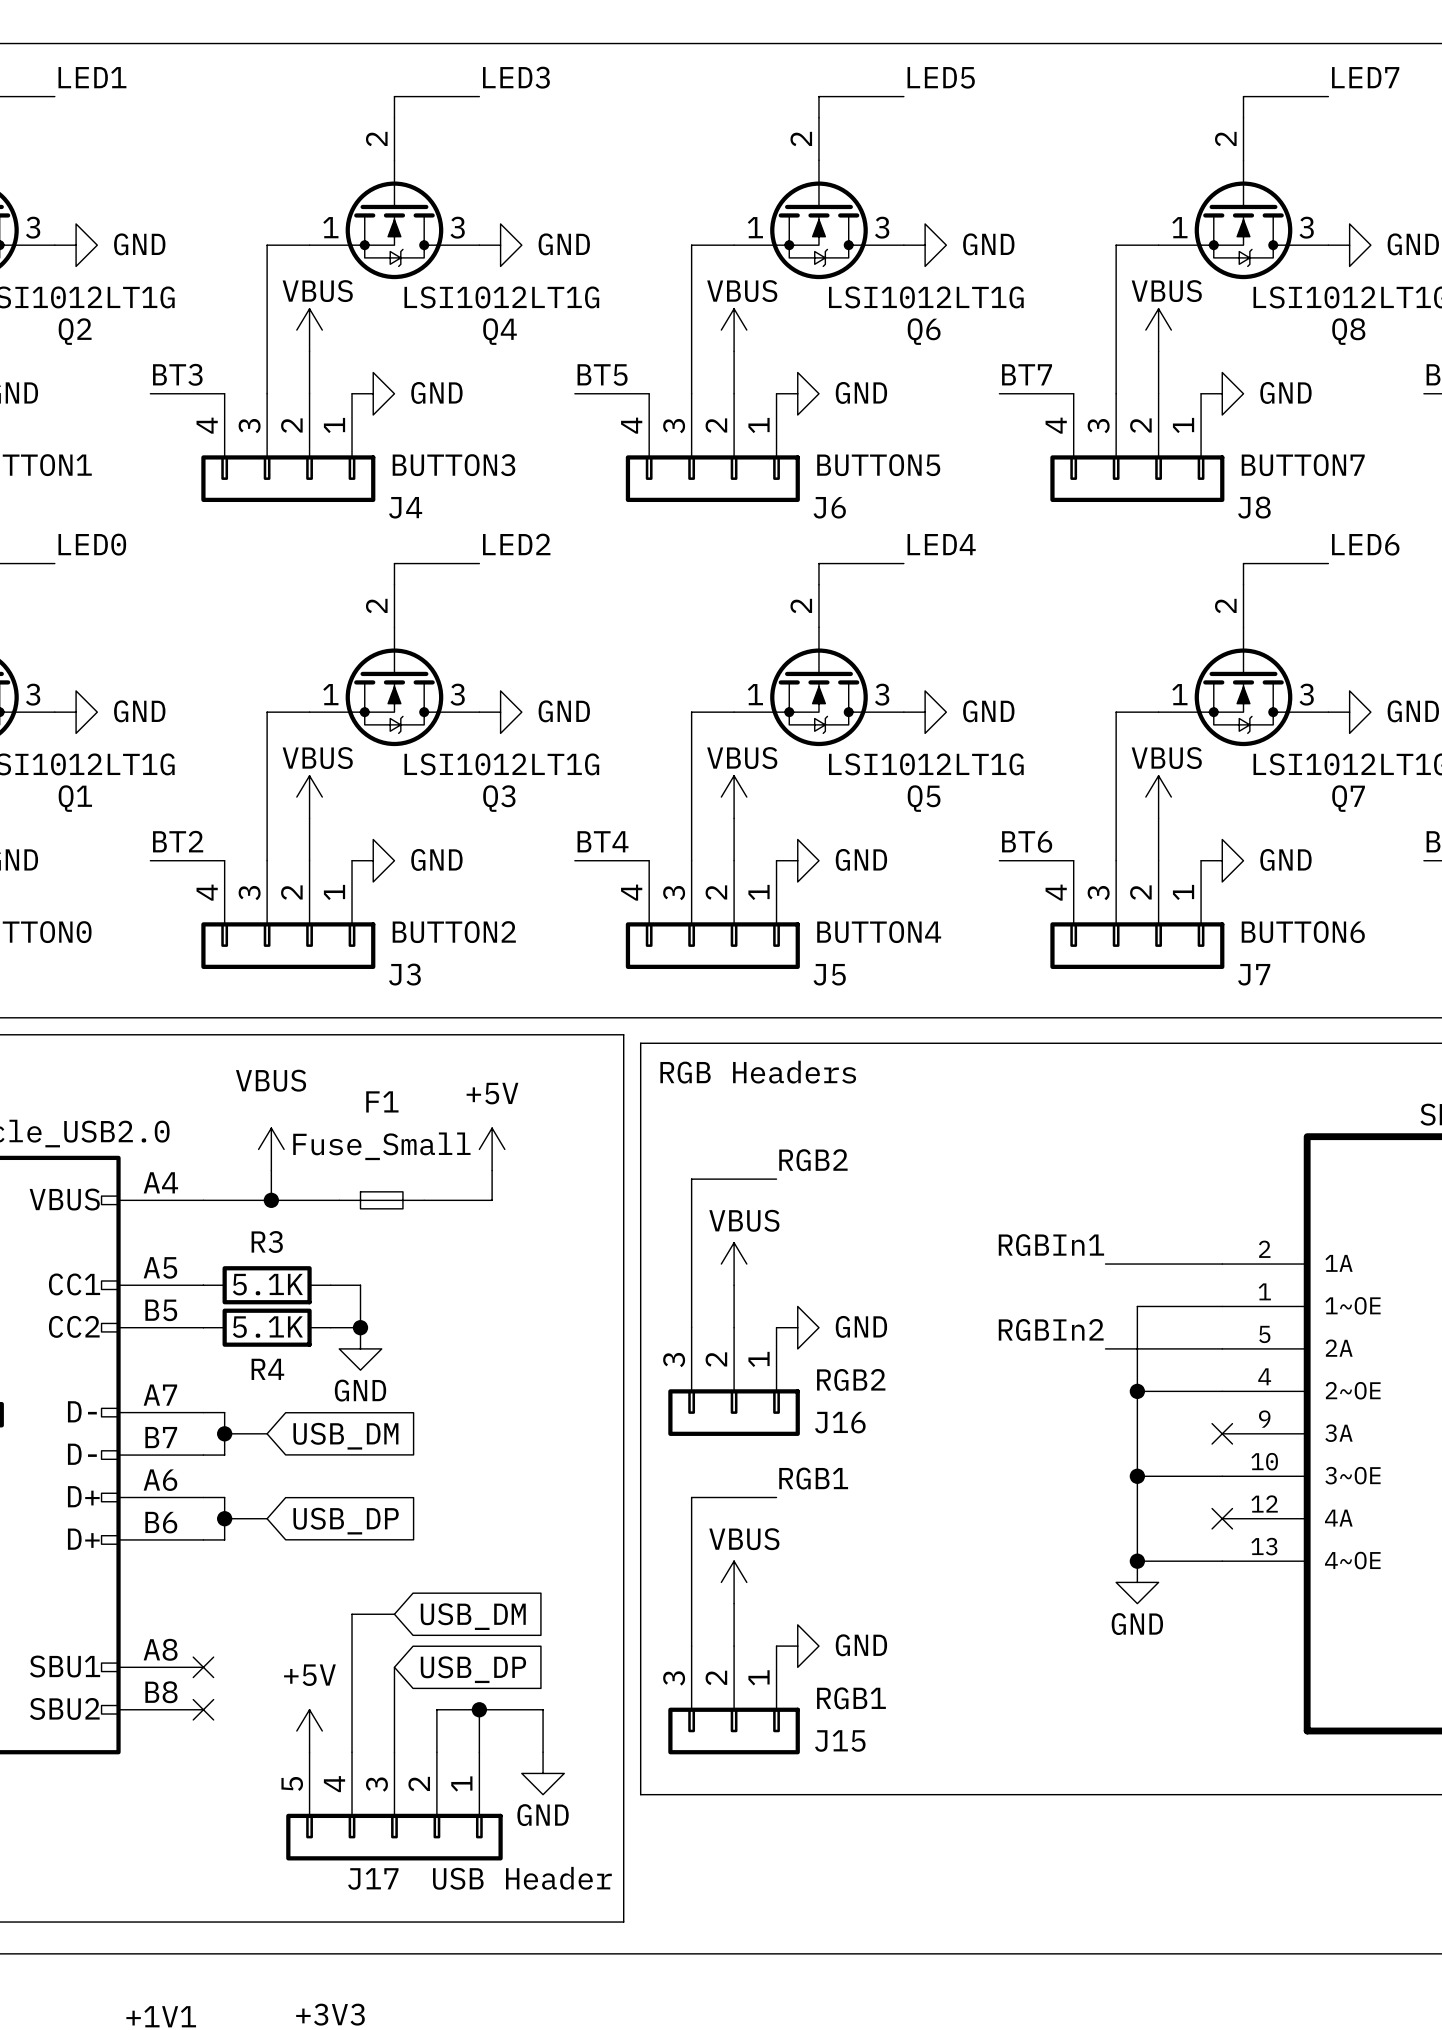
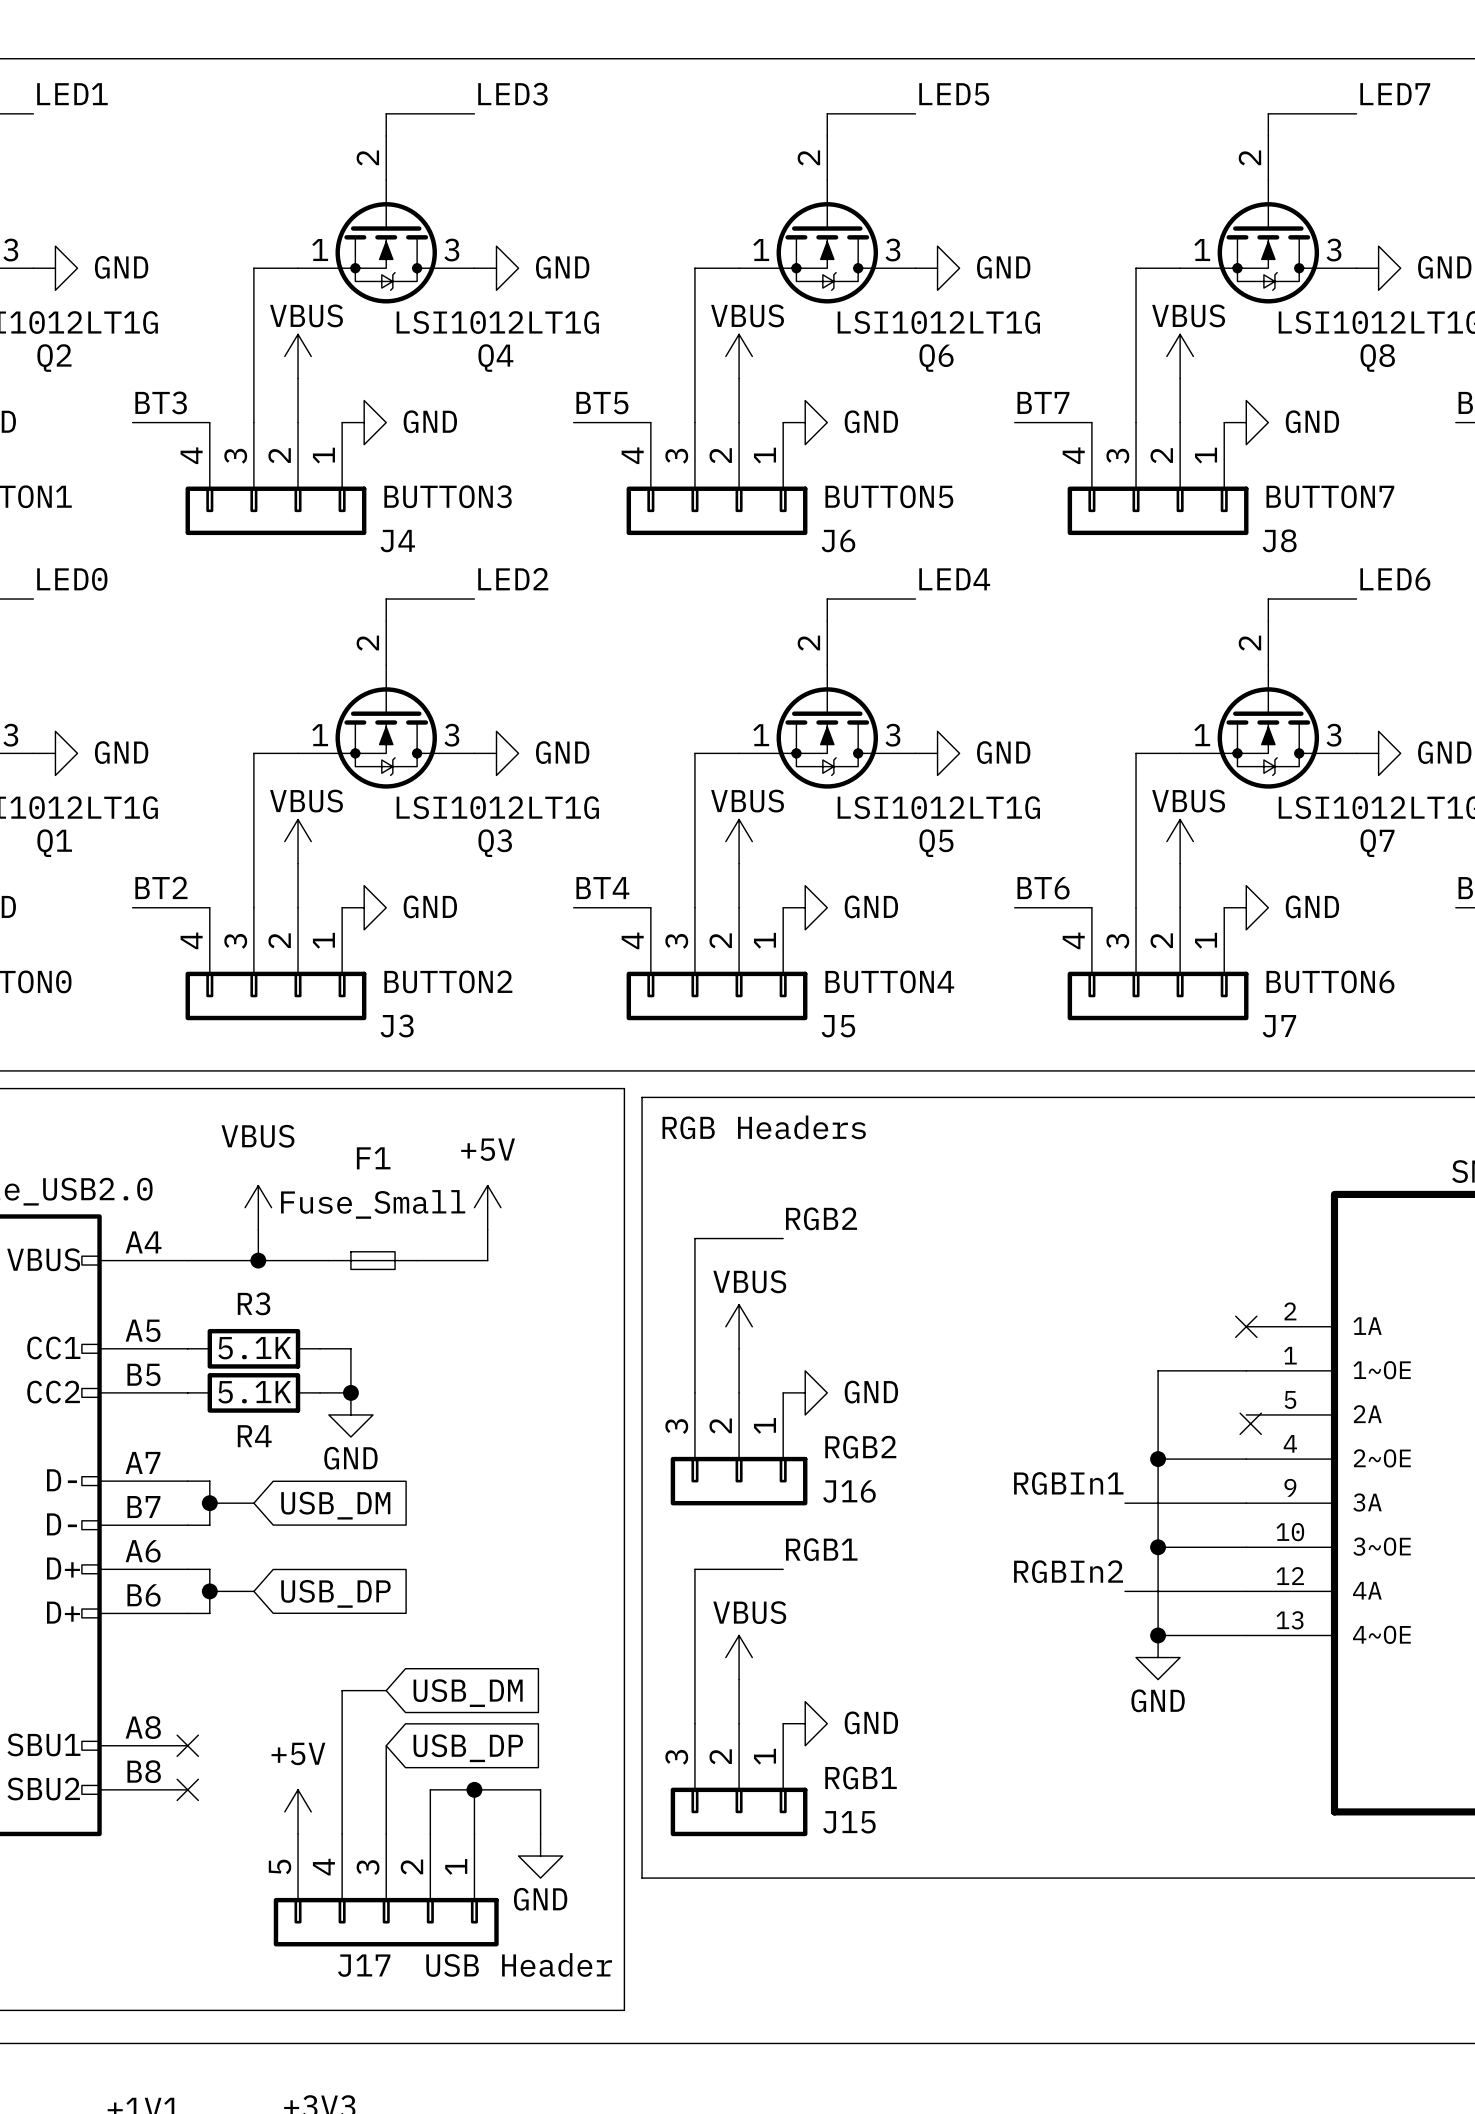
label position: RGBIn1 (1051, 1245) -> RGBIn1 (1068, 1483)
wire: (1105, 1264) (1222, 1264) -> (1124, 1591) (1246, 1591)
no-connect mark: none -> (1246, 1326)
label position: RGBIn2 (1051, 1329) -> RGBIn2 (1068, 1571)
wire: (1105, 1348) (1222, 1348) -> (1124, 1503) (1246, 1503)
no-connect mark position: (1222, 1433) -> (1250, 1423)
no-connect mark: (1222, 1518) -> none

